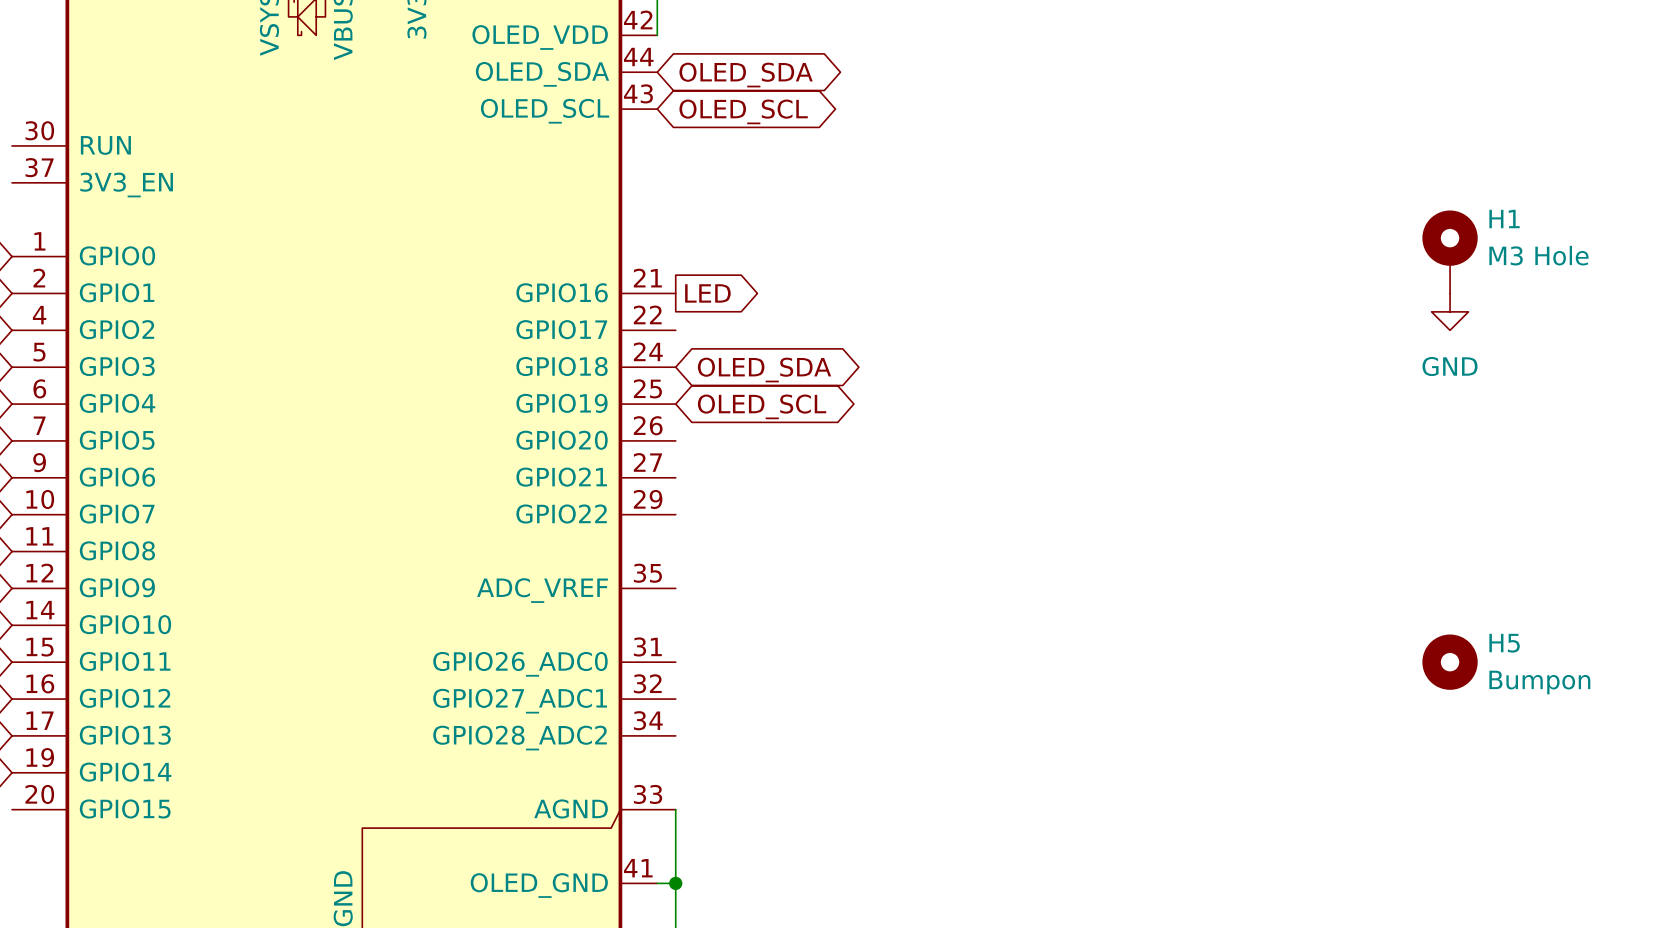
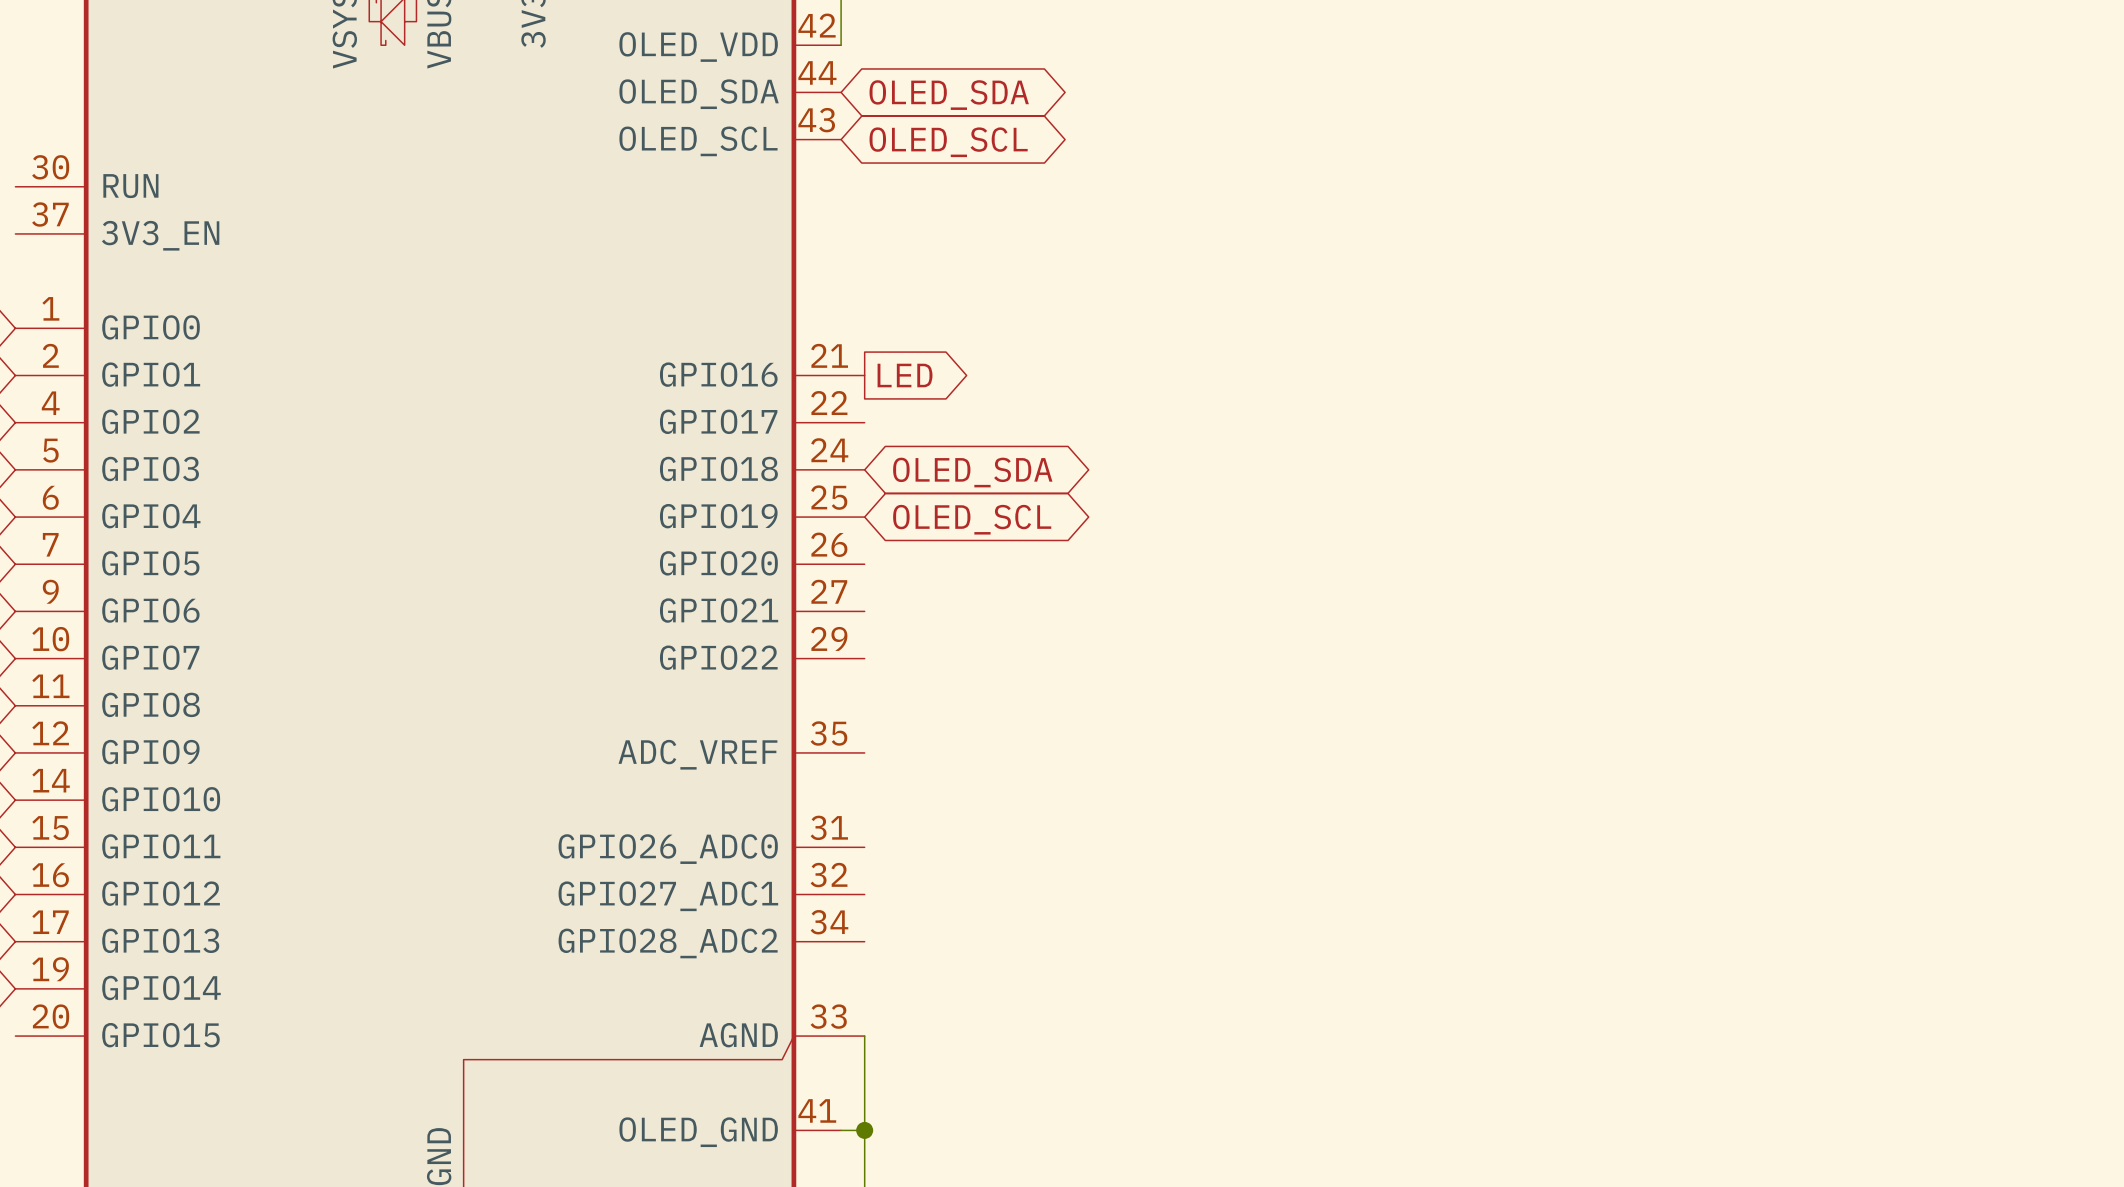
H1: M3 Hole (1450, 251) -> none
power symbol: GND (1450, 311) -> none
H5: Bumpon (1450, 662) -> none

